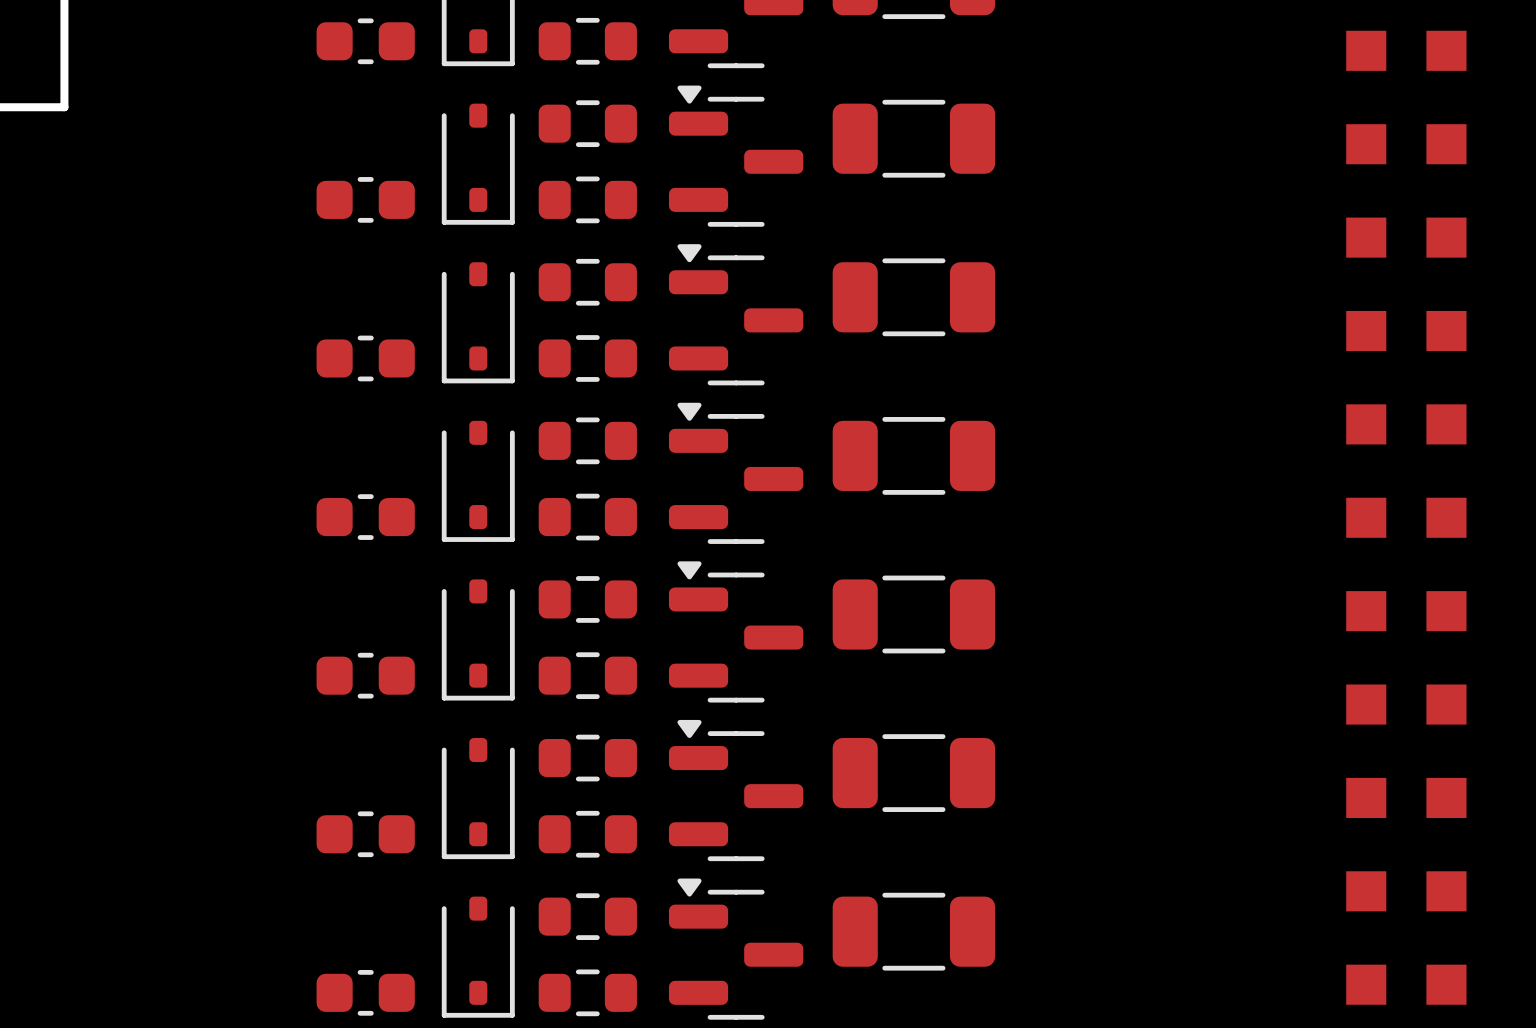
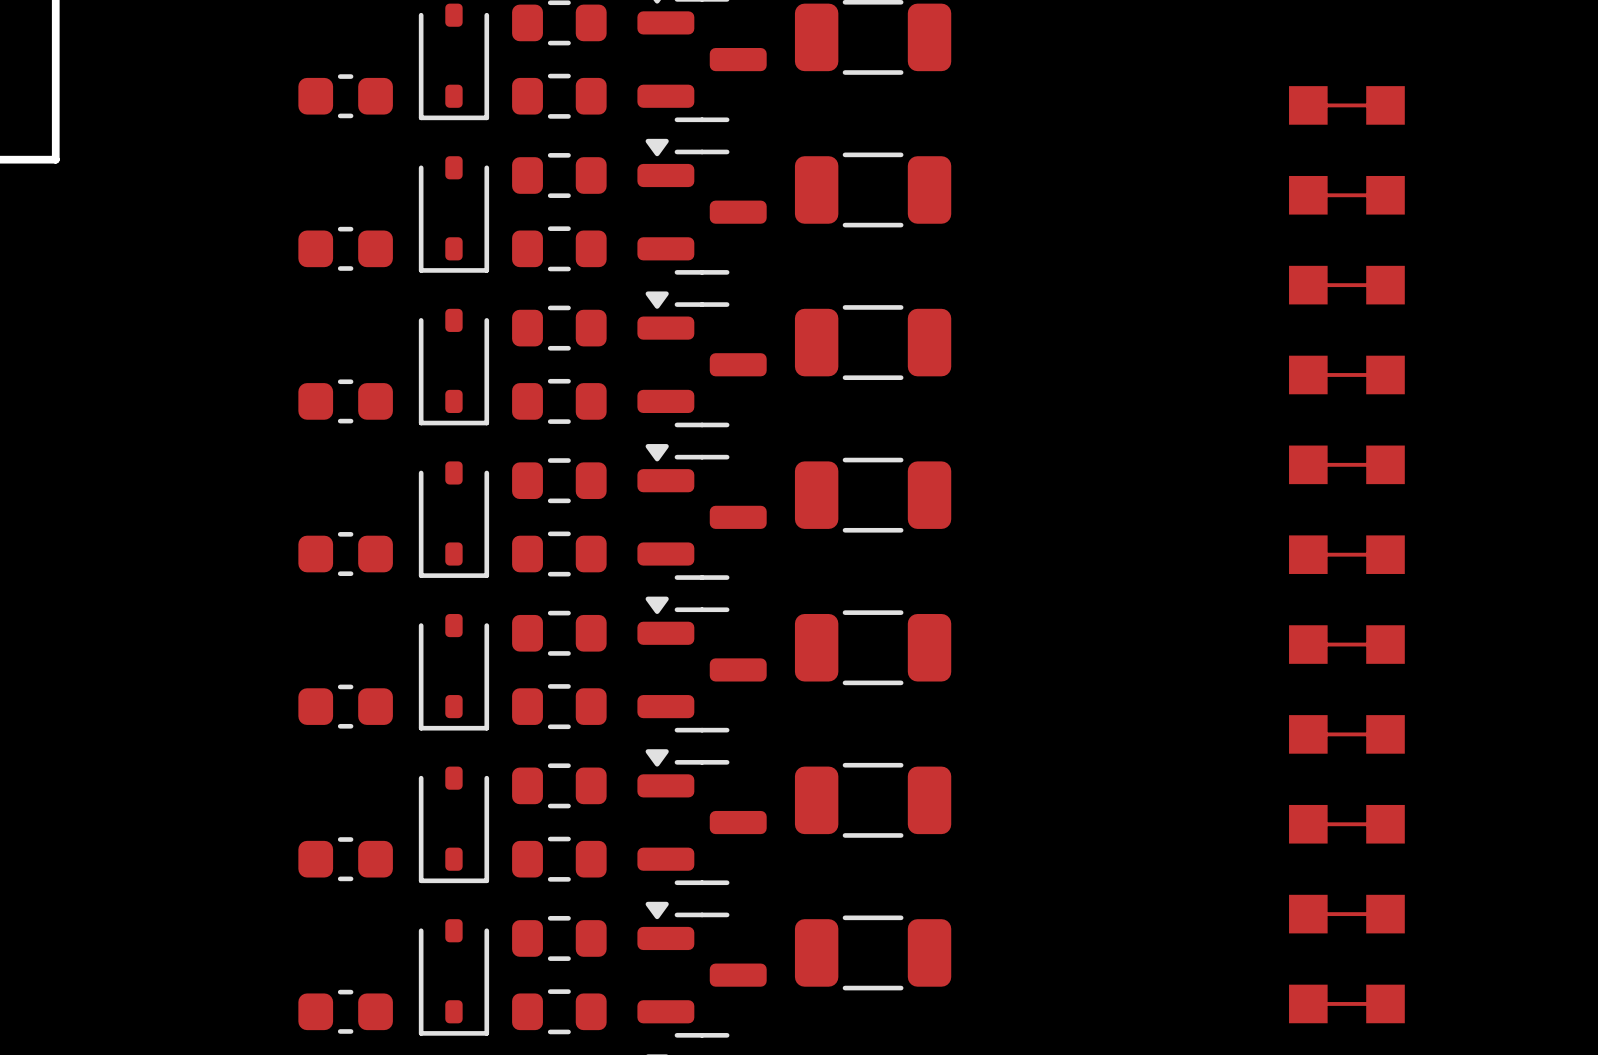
part footprint: [1346, 30, 1467, 71] -> [1289, 86, 1405, 125]
part footprint: [1346, 124, 1467, 165] -> [1289, 175, 1405, 215]
part footprint: [1346, 217, 1467, 258] -> [1289, 265, 1405, 305]
part footprint: [1346, 310, 1467, 352] -> [1289, 355, 1405, 395]
part footprint: [1346, 404, 1467, 445] -> [1289, 445, 1405, 485]
part footprint: [1346, 497, 1467, 538] -> [1289, 535, 1405, 574]
part footprint: [1346, 591, 1467, 632] -> [1289, 625, 1405, 664]
part footprint: [1346, 684, 1467, 725] -> [1289, 715, 1405, 754]
part footprint: [1346, 777, 1467, 818] -> [1289, 804, 1405, 844]
part footprint: [1346, 871, 1467, 912] -> [1289, 894, 1405, 934]
part footprint: [1346, 964, 1467, 1005] -> [1289, 984, 1405, 1024]

